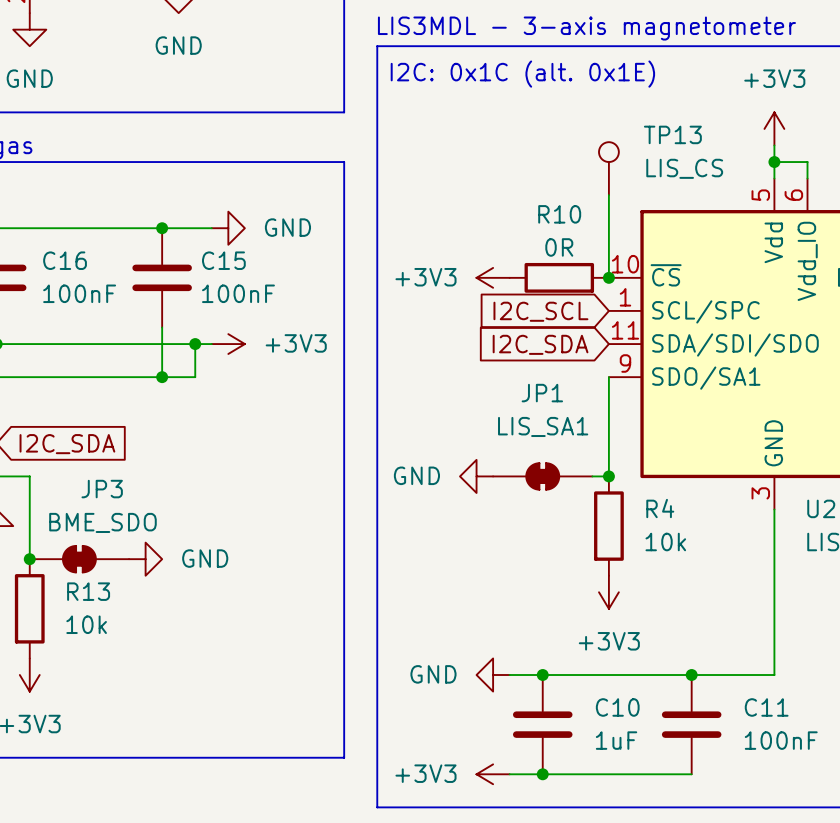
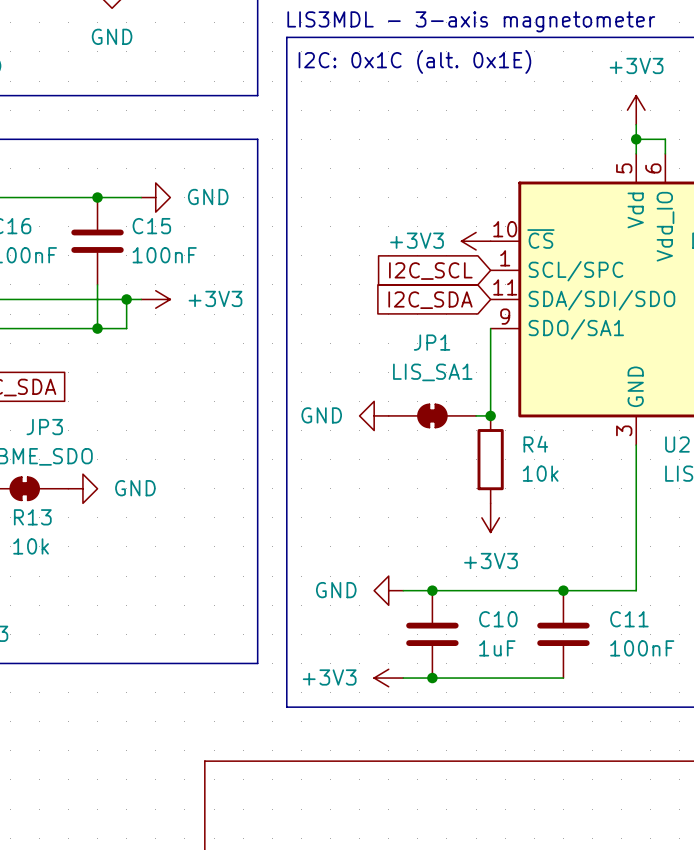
TP13: LIS_CS (608, 168) -> none
wire: (608, 195) (608, 277) -> none
power symbol position: +3V3 (493, 277) -> +3V3 (476, 241)
R10: 0R (559, 277) -> none
junction: (608, 277) -> none

